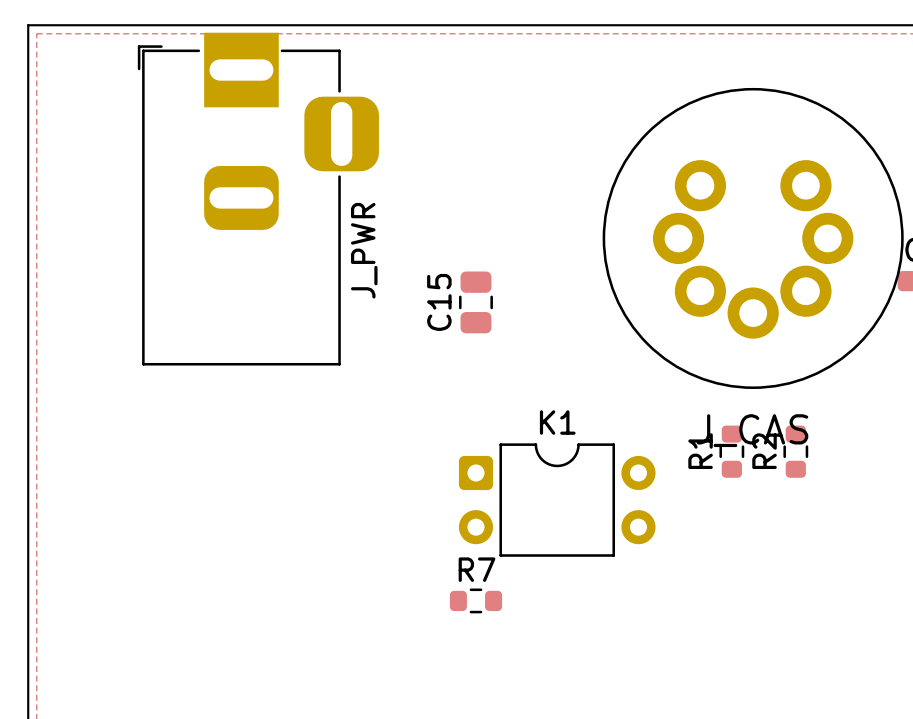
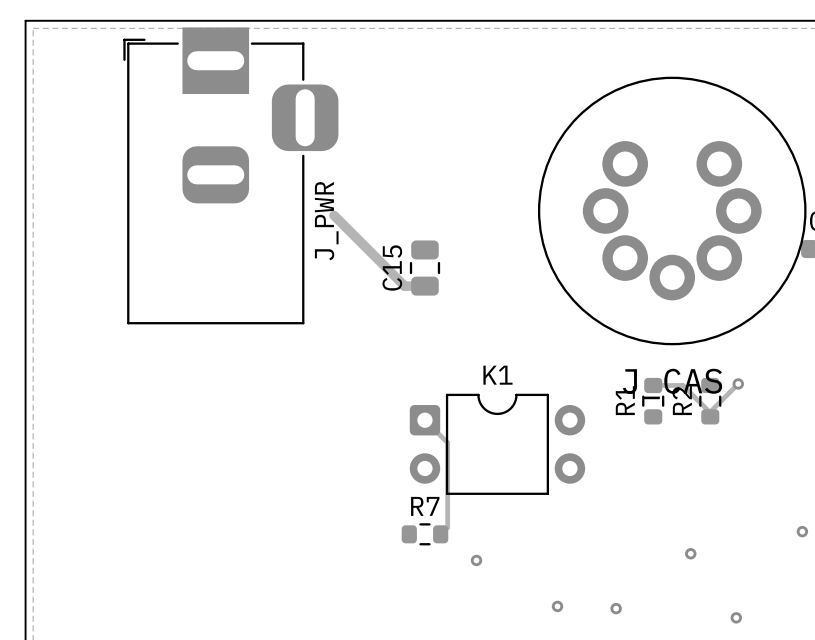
track: none -> (334, 215) (404, 286) (424, 286)
track: none -> (738, 383) (709, 412)
via: none -> (738, 383)
track: none -> (653, 385) (683, 385) (709, 412)
track: none -> (424, 420) (447, 442) (447, 527) (440, 534)
via: none -> (802, 531)
via: none -> (690, 553)
via: none -> (476, 560)
via: none -> (557, 606)
via: none -> (616, 608)
via: none -> (736, 617)

